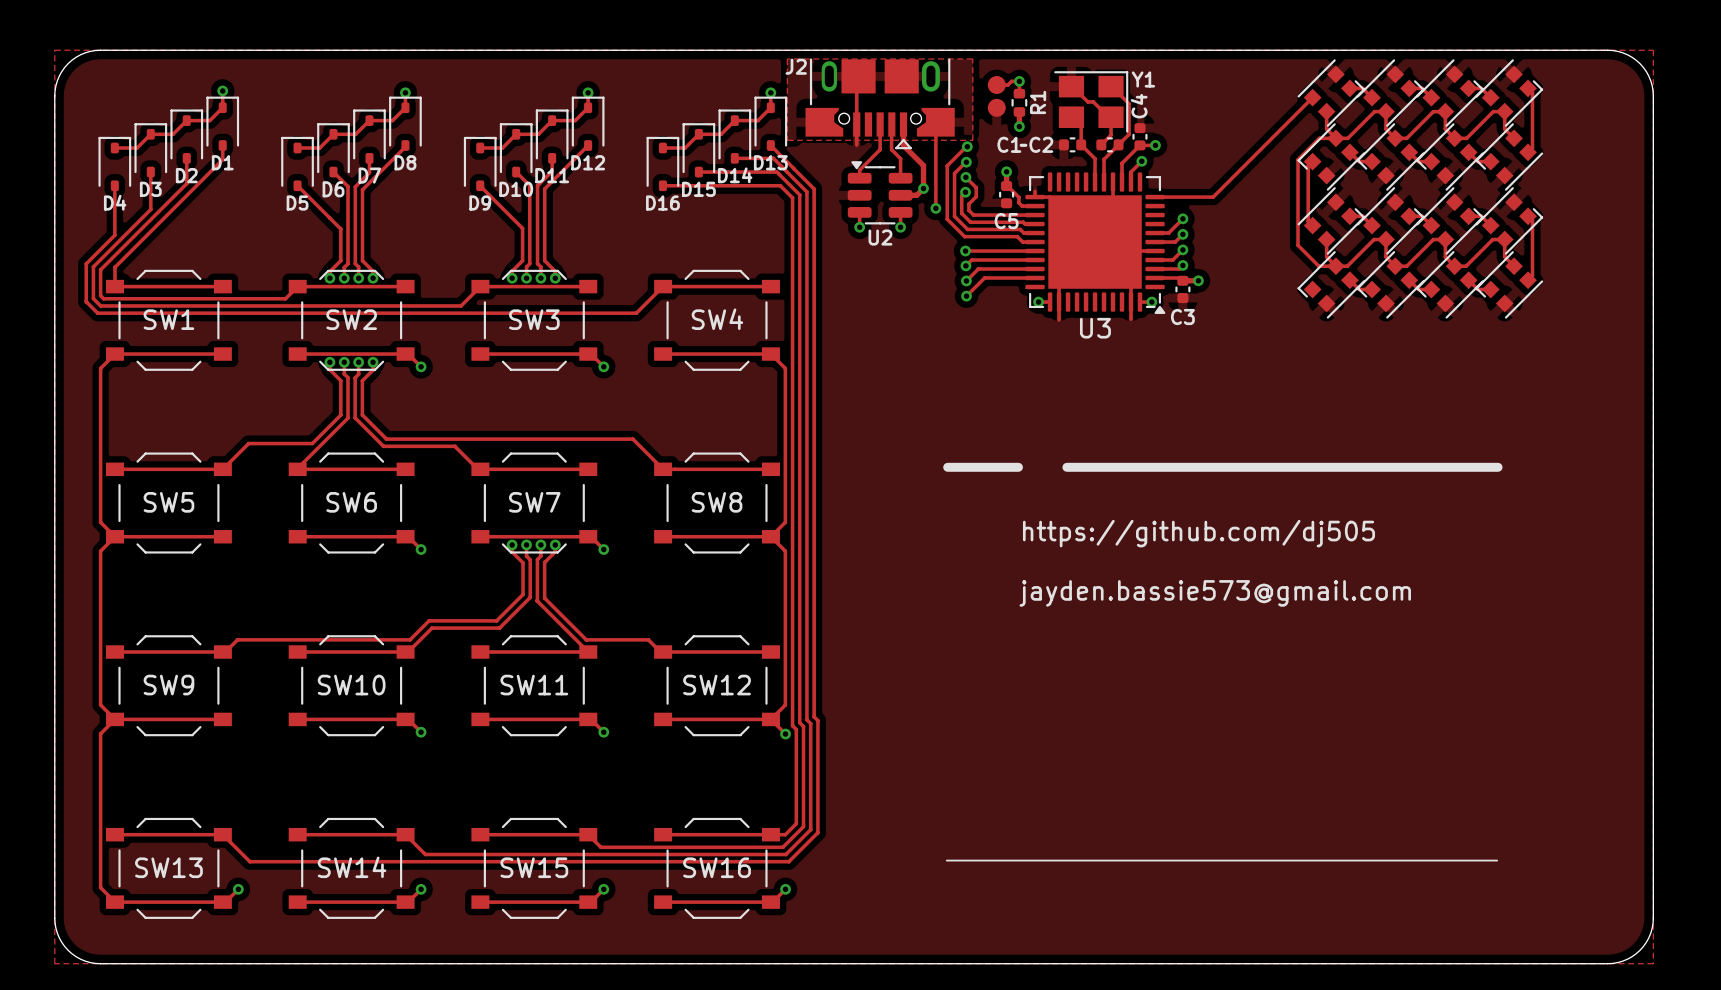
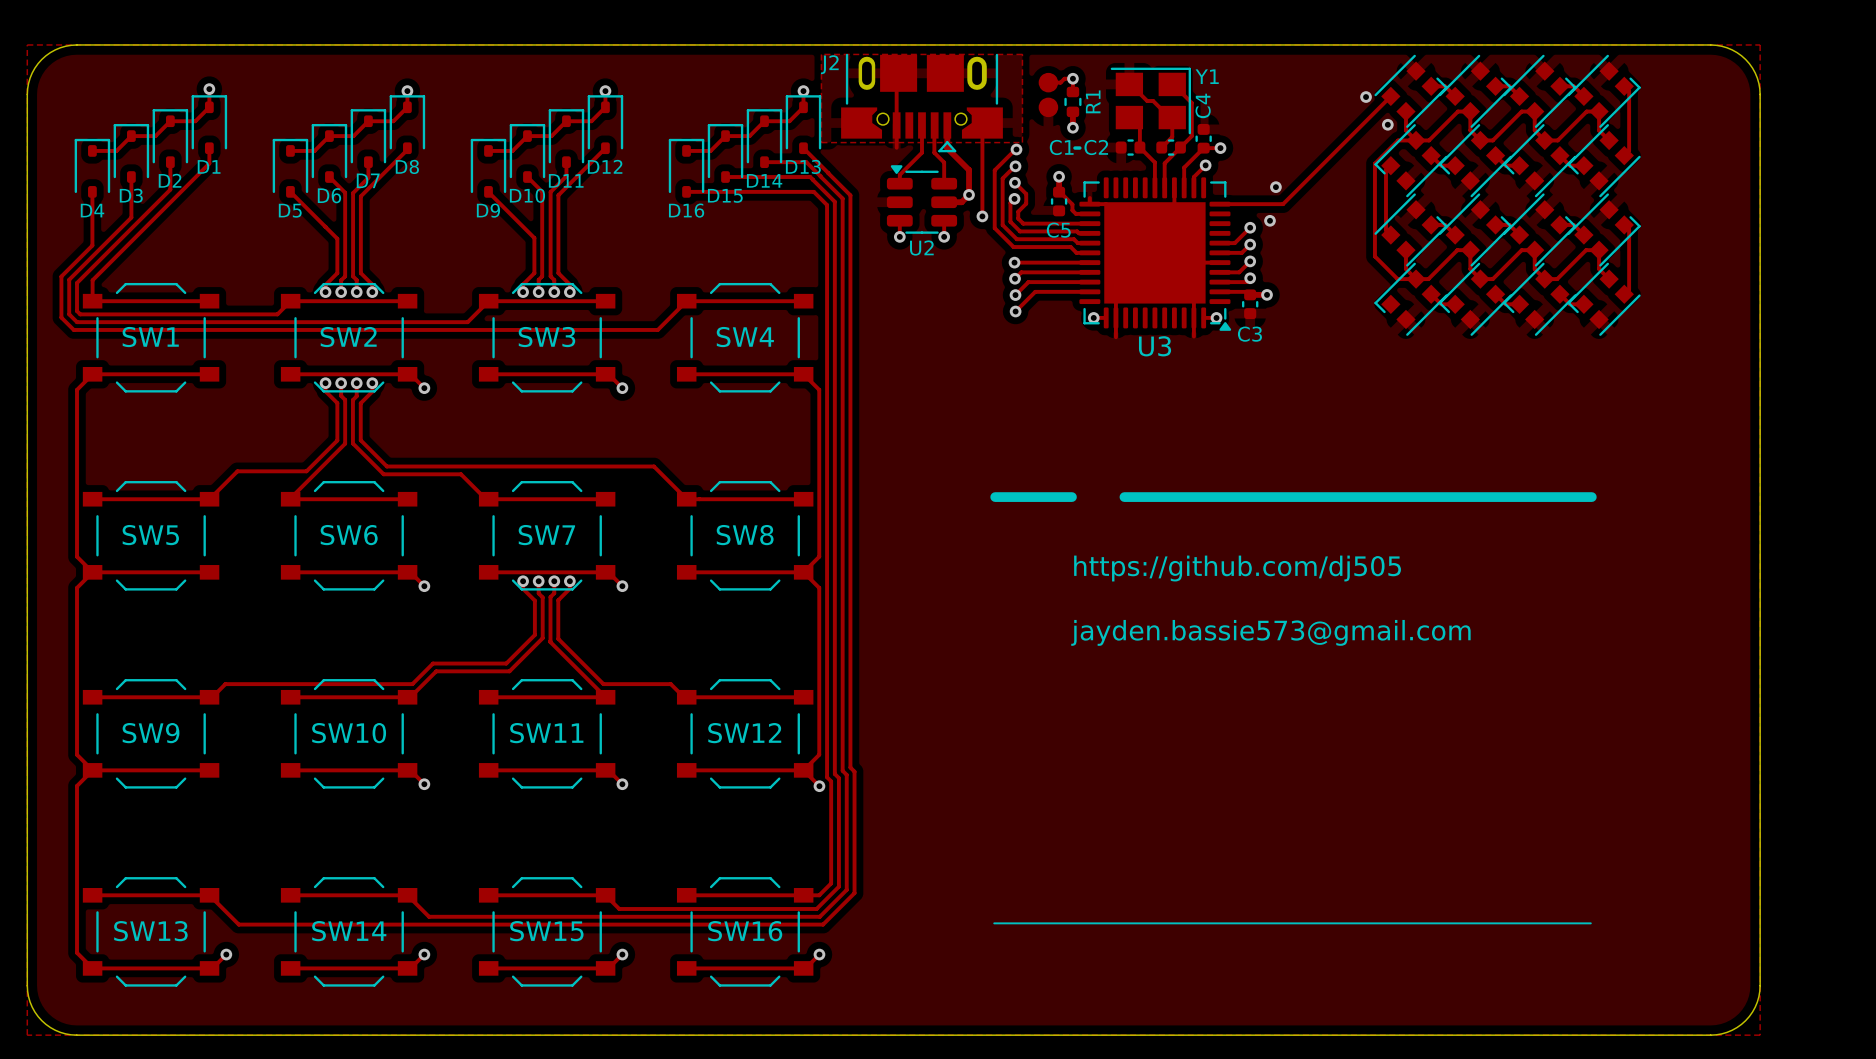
via: none -> (1366, 97)
via: none -> (1387, 124)
via: none -> (1275, 187)
via: none -> (1269, 220)

